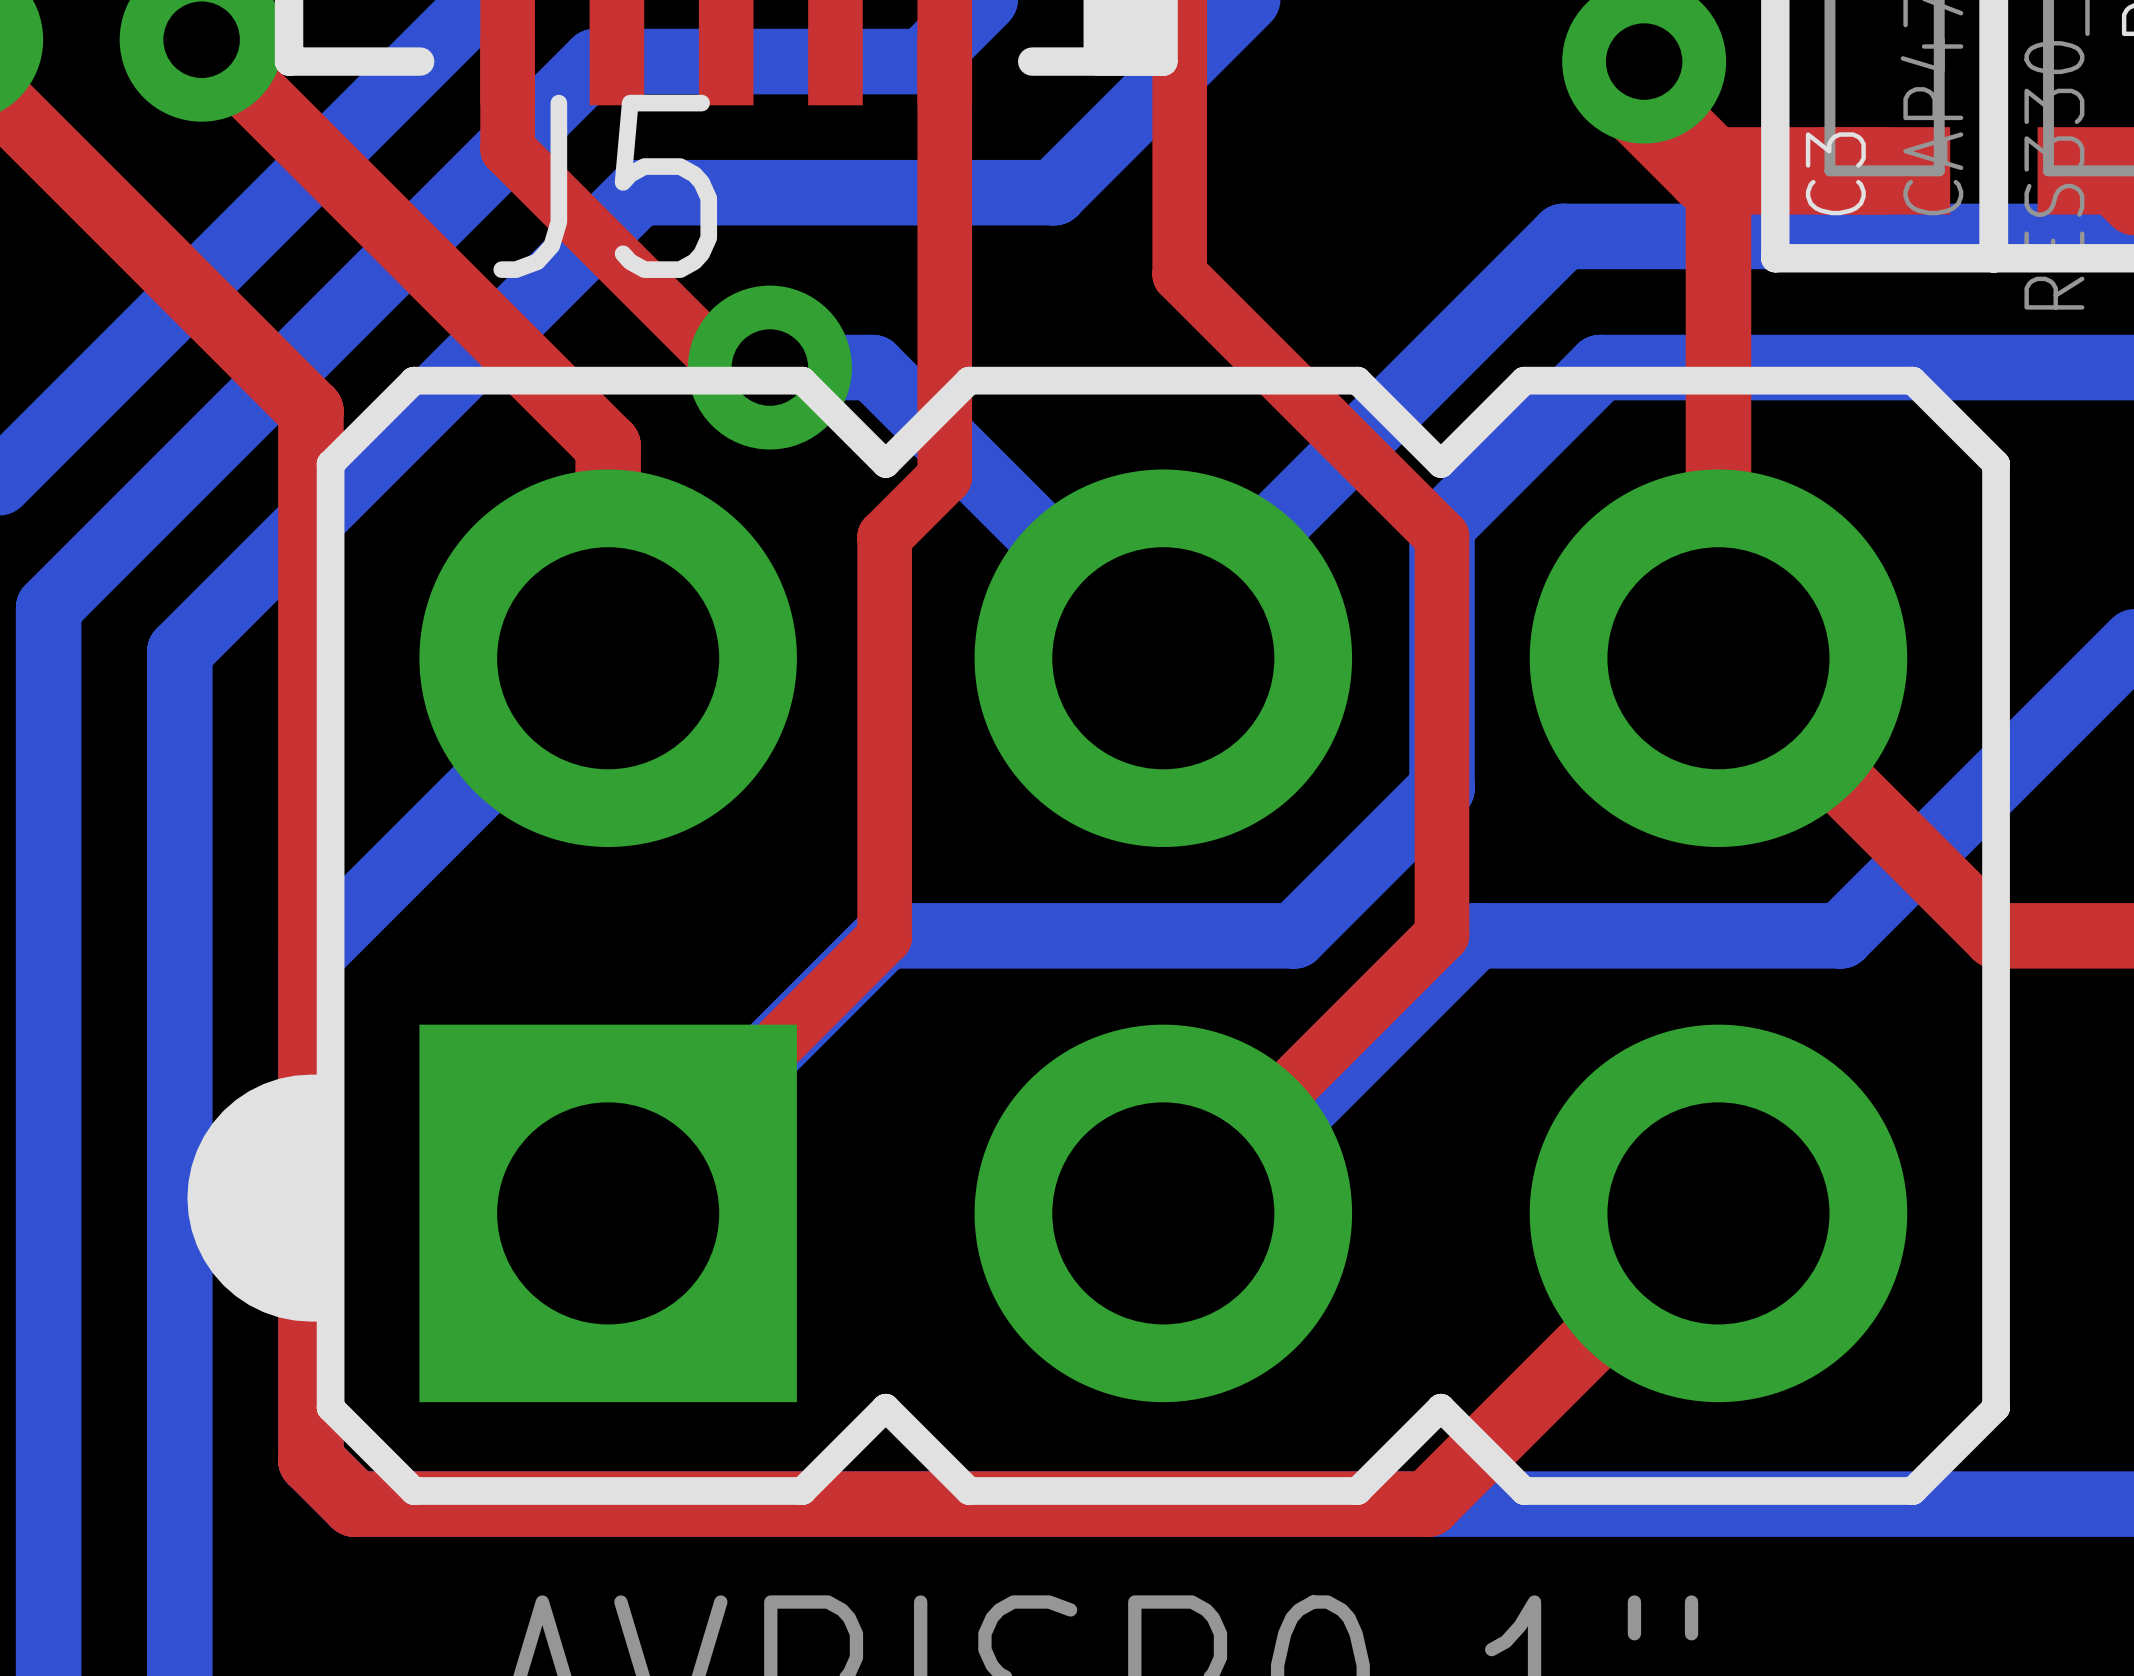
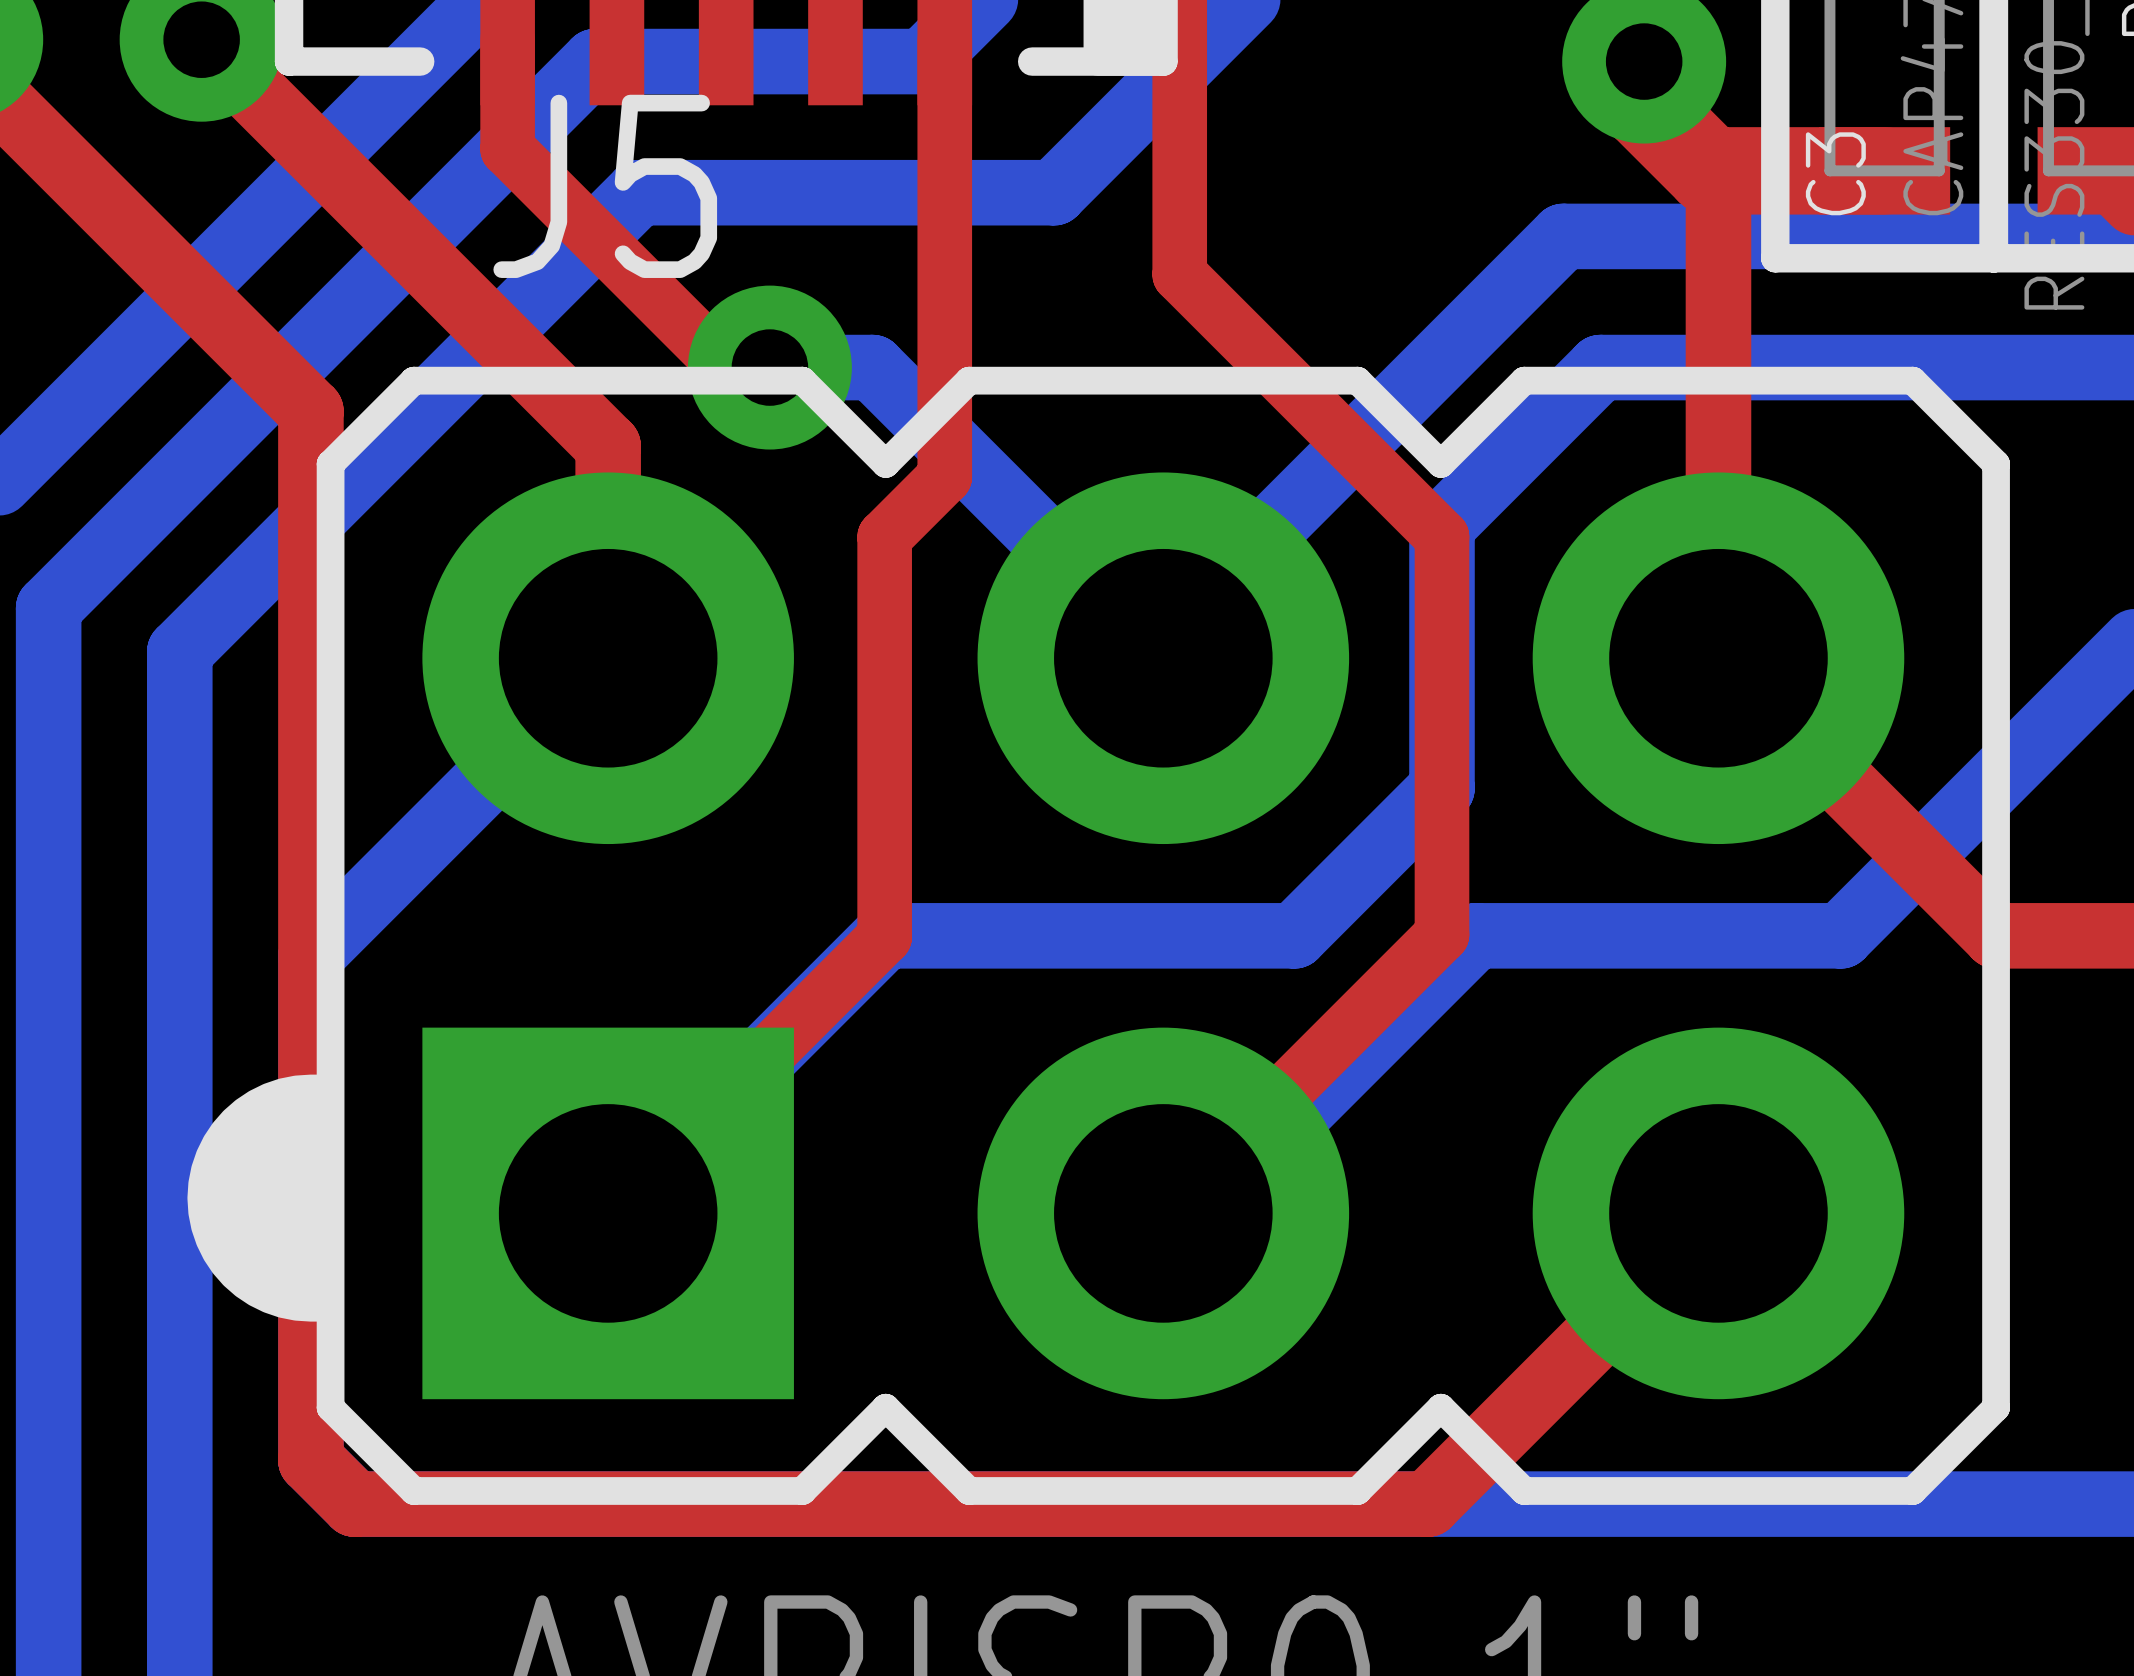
J5 footprint: [316, 366, 2010, 1505] -> [316, 366, 2010, 1505]

